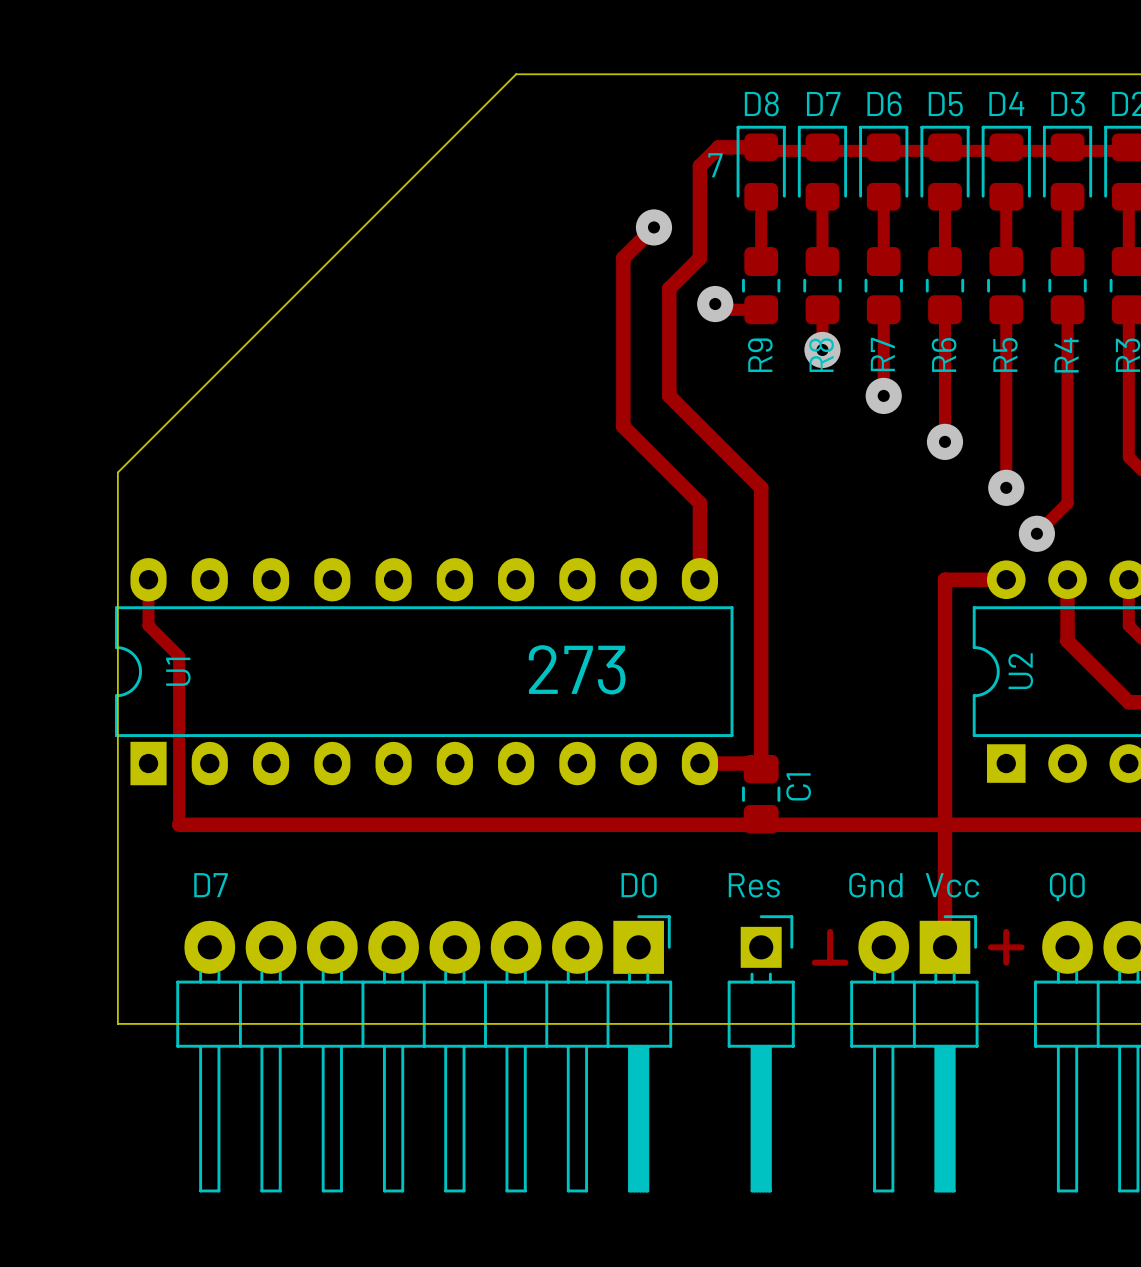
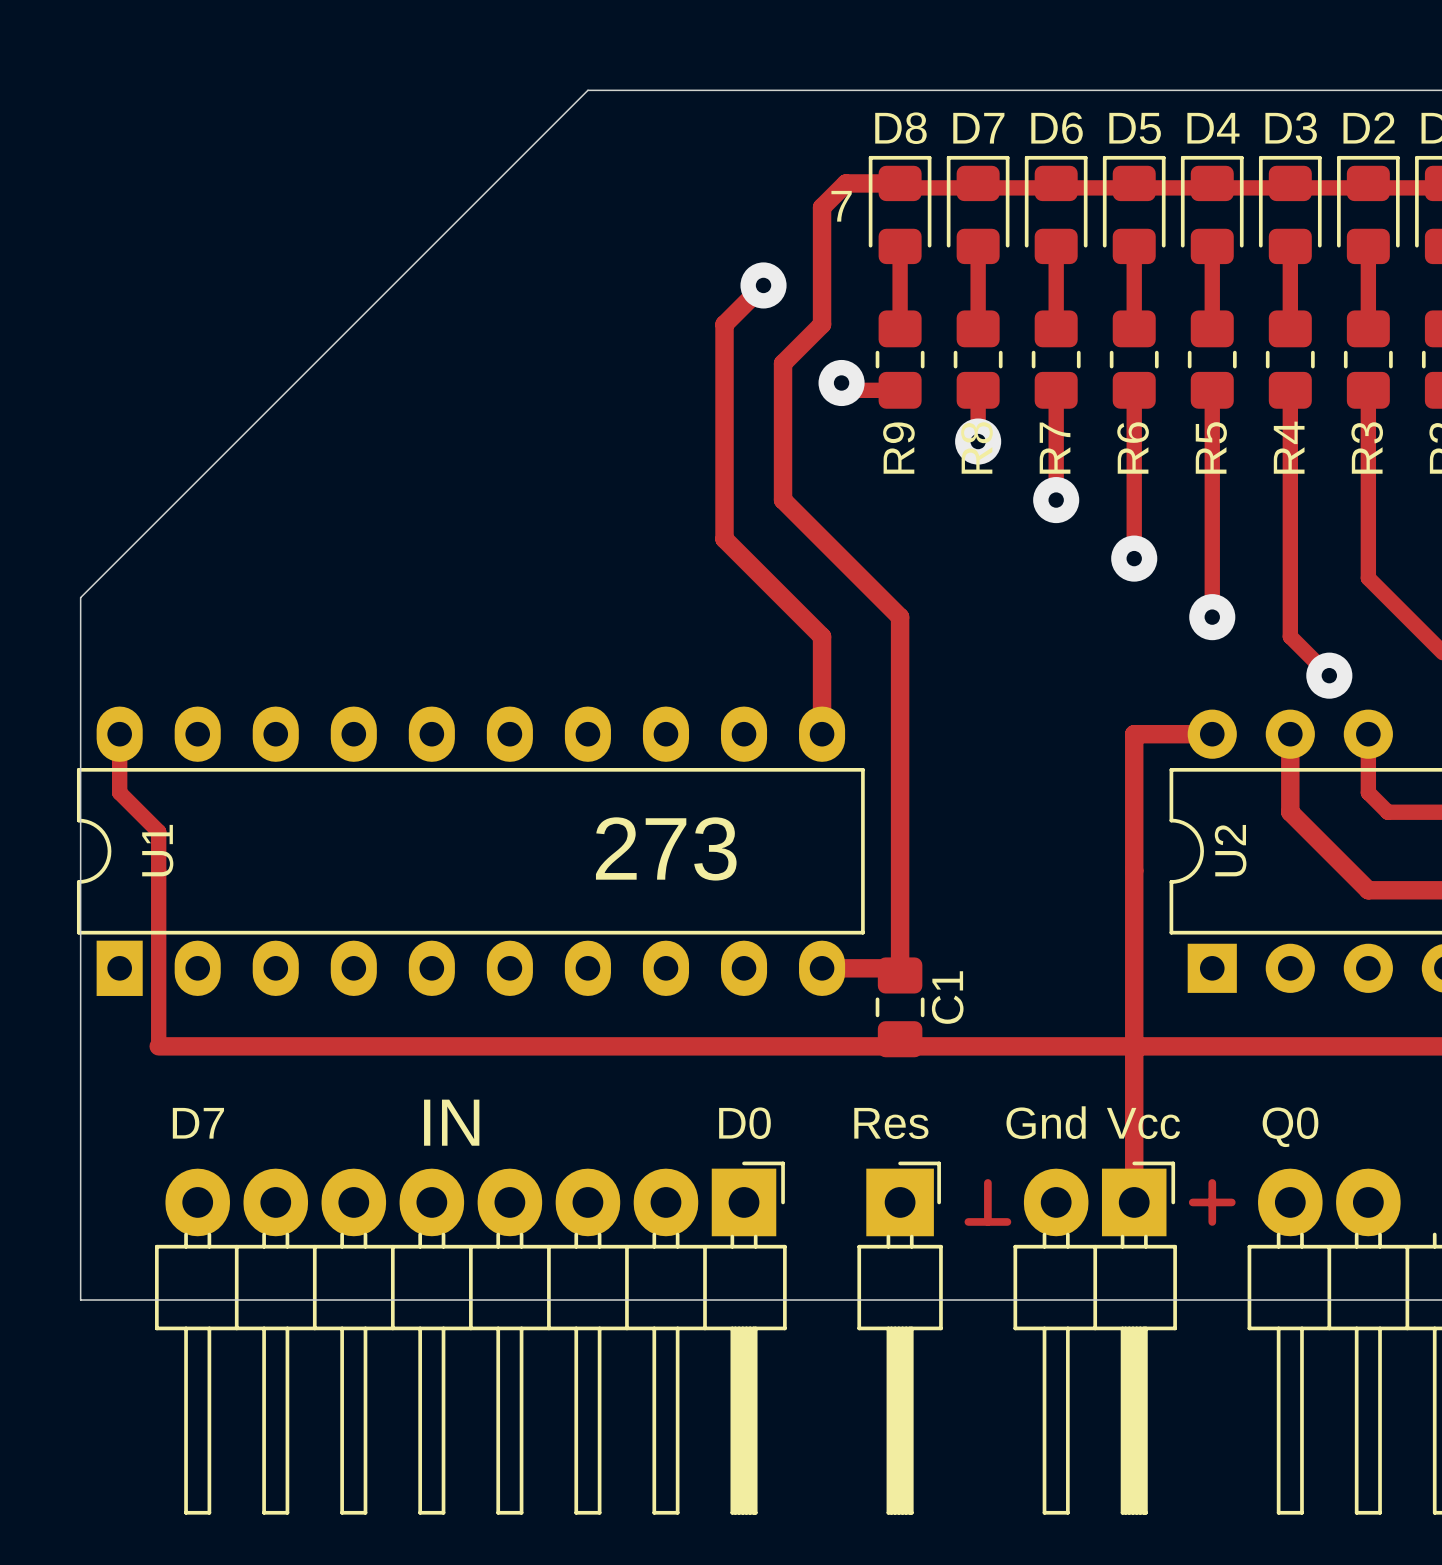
track: (1067, 503) (1036, 533) -> (1290, 636) (1329, 675)
via position: (1036, 533) -> (1329, 675)
text: none -> IN (451, 1122)
part footprint: [727, 915, 795, 1193] -> [857, 1161, 943, 1515]

